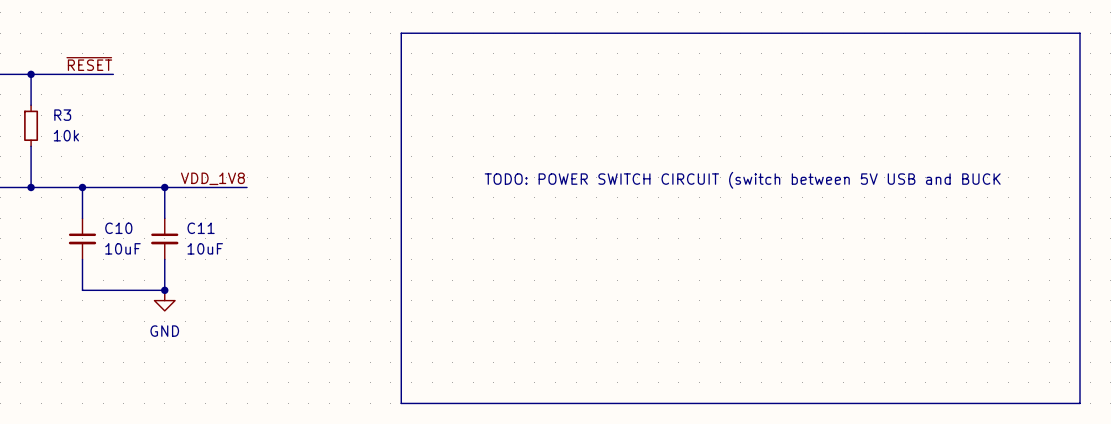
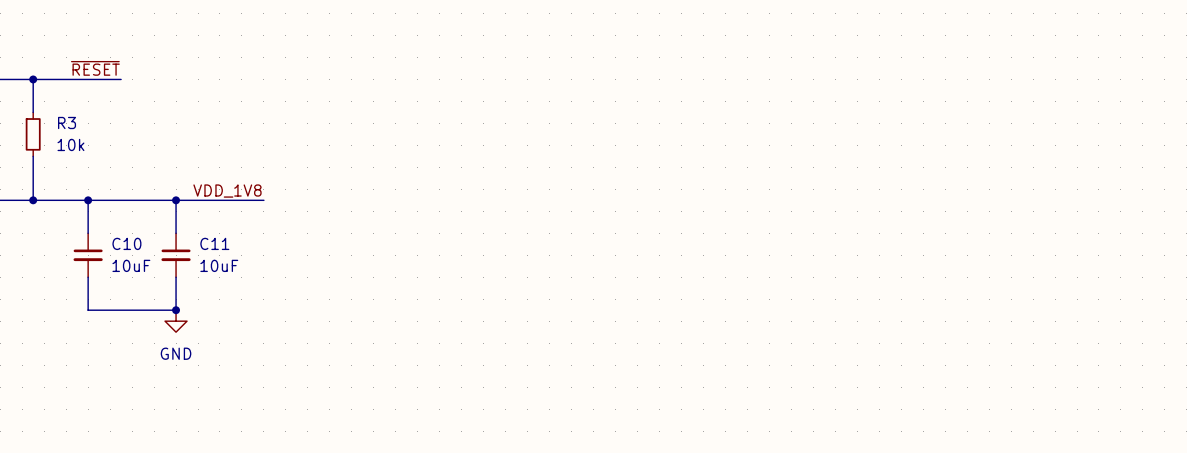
line: (401, 33) (401, 403) (1080, 403) (1080, 33) (401, 33) -> none
text: TODO: POWER SWITCH CIRCUIT (switch between 5V USB and BUCK (742, 180) -> none

